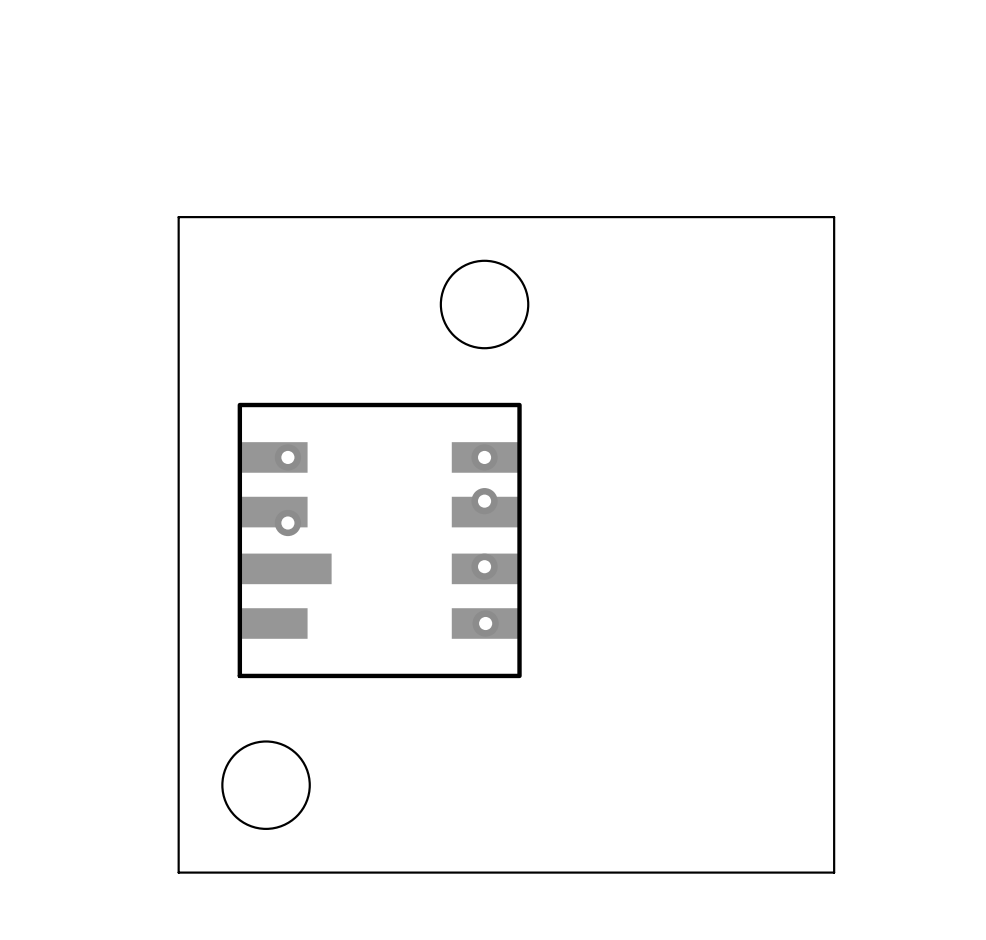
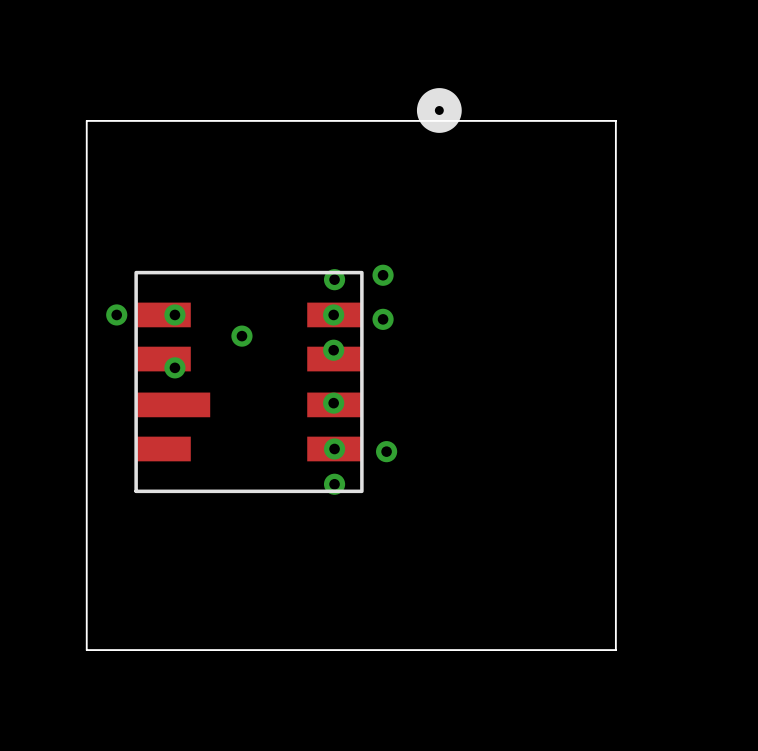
part: none -> (439, 110)
round board edge: [439, 259, 530, 350] -> none
via: none -> (383, 275)
via: none -> (334, 279)
via: none -> (116, 314)
via: none -> (383, 319)
via: none -> (241, 336)
via: none -> (386, 451)
via: none -> (334, 484)
round board edge: [221, 740, 311, 830] -> none

